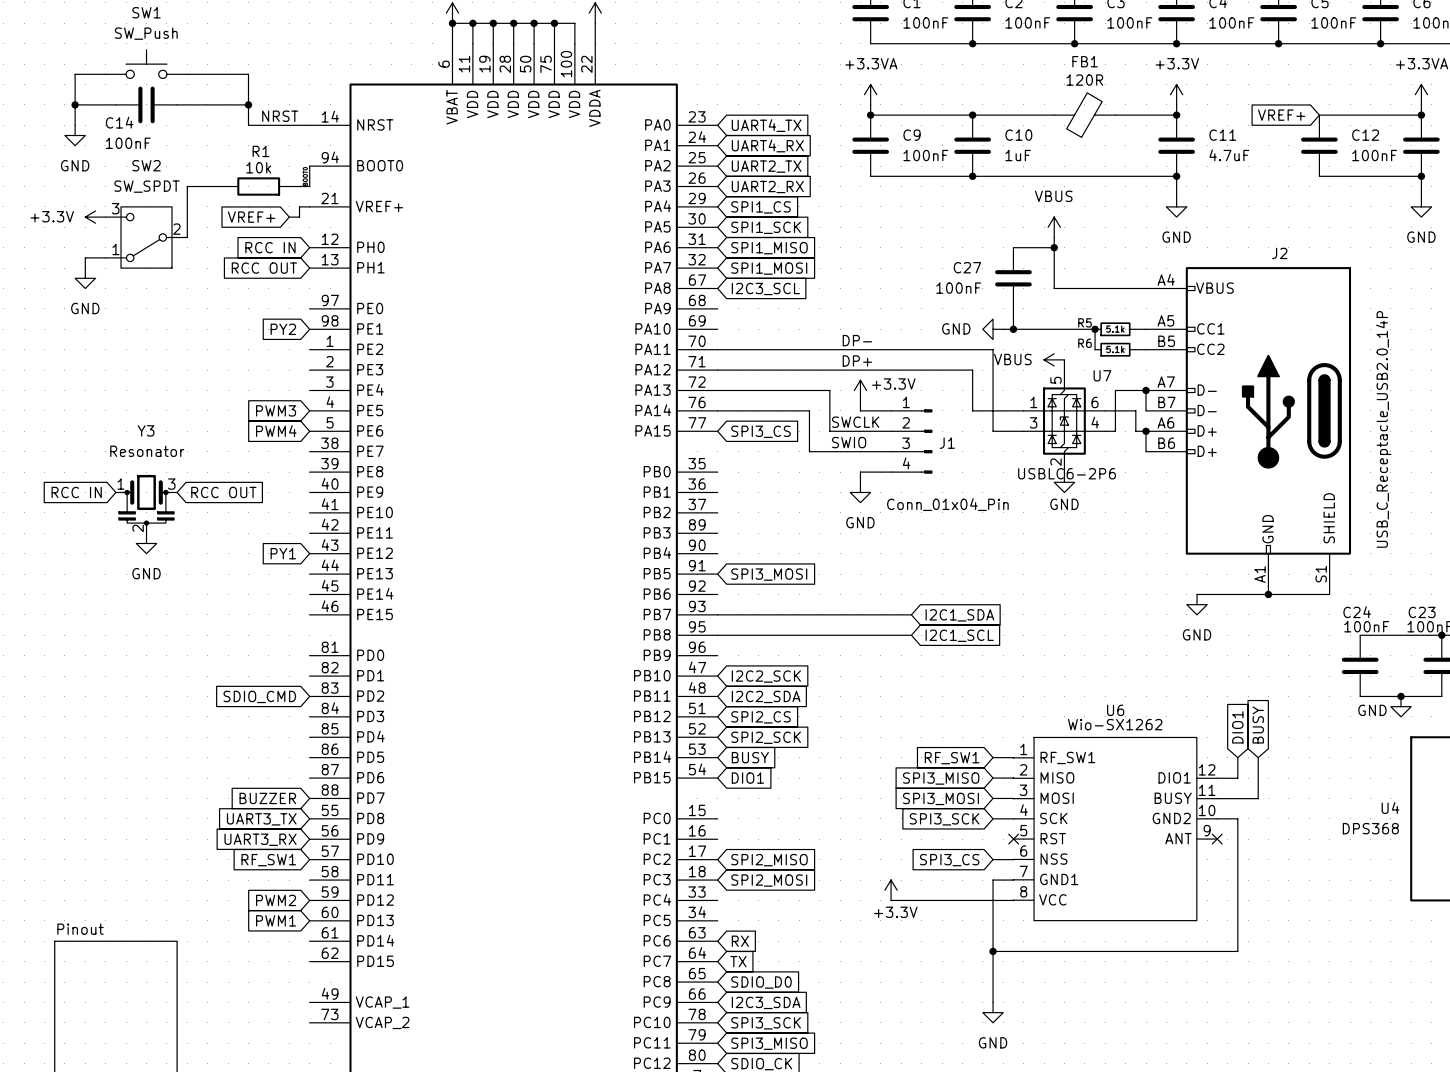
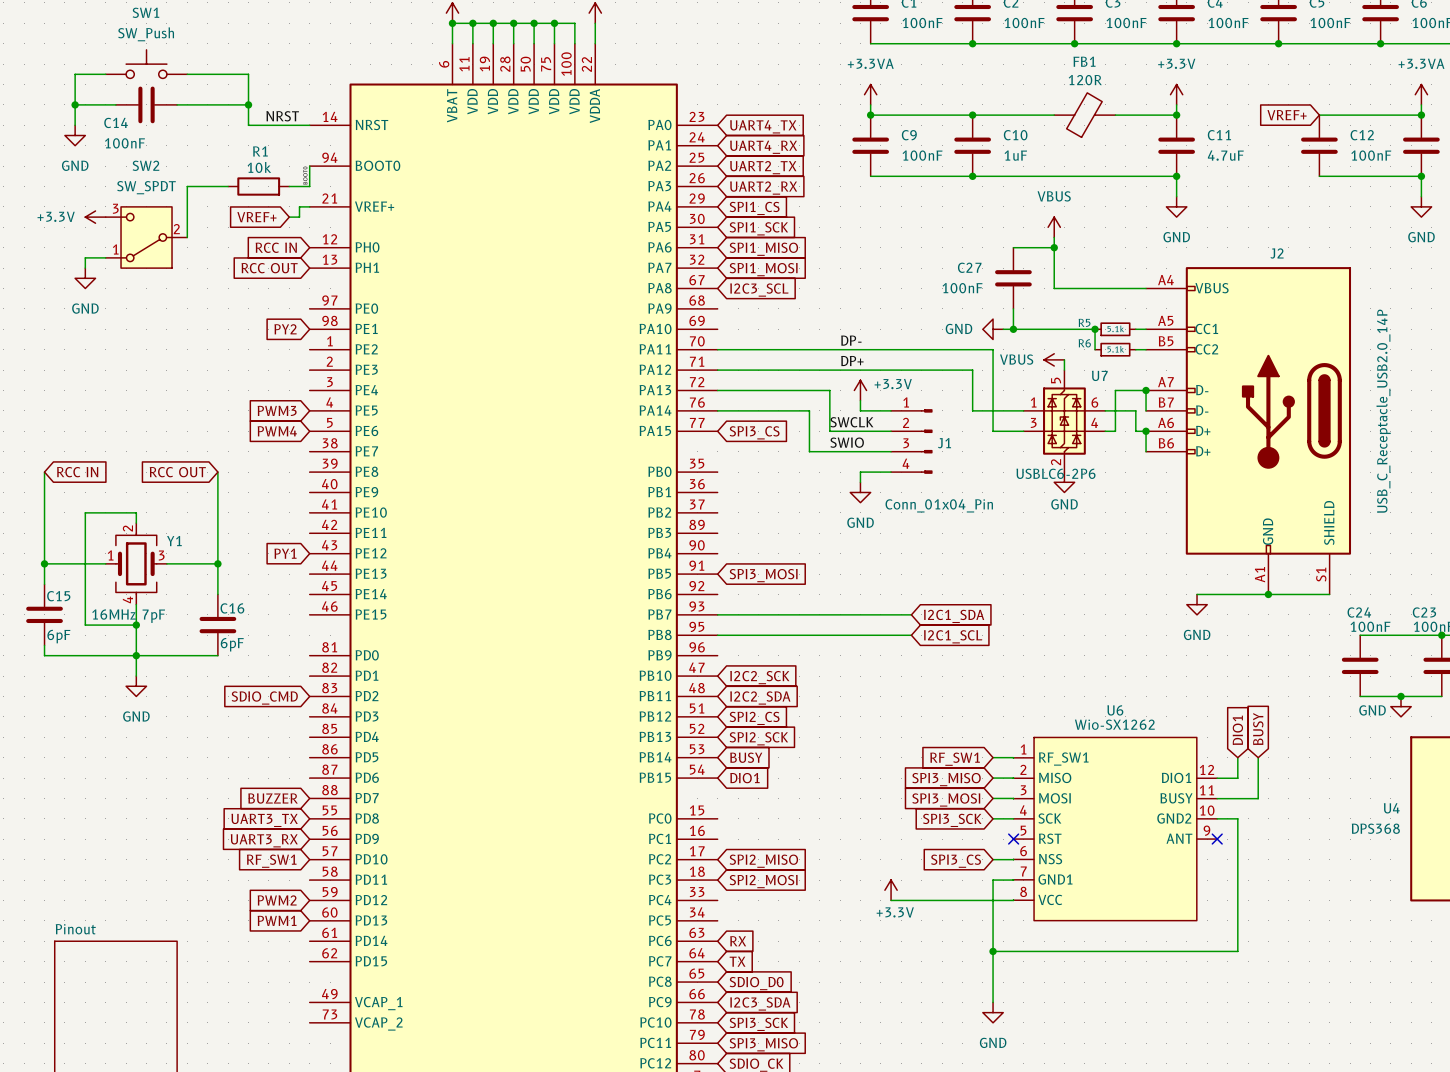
wire: none -> (44, 472) (44, 584)
wire: none -> (217, 472) (217, 594)
global label rotation: 0° (76, 492) -> 180° (77, 472)
global label rotation: 0° (223, 492) -> 180° (177, 472)
Y3: Resonator (146, 504) -> none
wire: none -> (136, 523) (136, 512) (85, 512) (85, 625) (136, 625)
power symbol position: GND (146, 543) -> GND (136, 686)
wire: none -> (44, 563) (105, 563)
junction: none -> (44, 563)
Y1: none -> 16MHz 7pF (136, 563)
wire: none -> (166, 563) (217, 563)
junction: none -> (217, 563)
wire: none -> (136, 604) (136, 676)
C15: none -> 6pF (44, 614)
junction: none -> (136, 625)
C16: none -> 6pF (217, 625)
wire: none -> (44, 645) (44, 655) (217, 655)
junction: none -> (136, 655)

